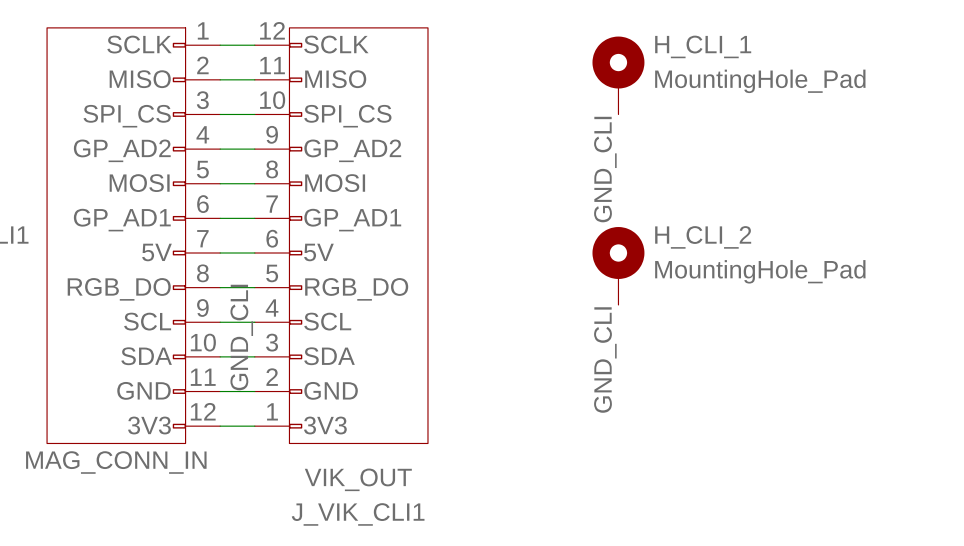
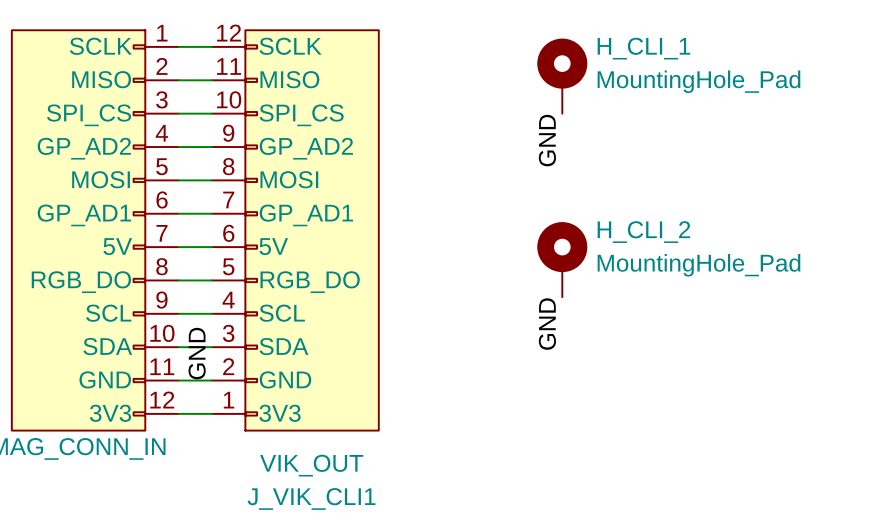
label: GND_CLI (605, 169) -> GND (547, 140)
label: GND_CLI (241, 337) -> GND (197, 353)
label: GND_CLI (605, 360) -> GND (547, 324)

